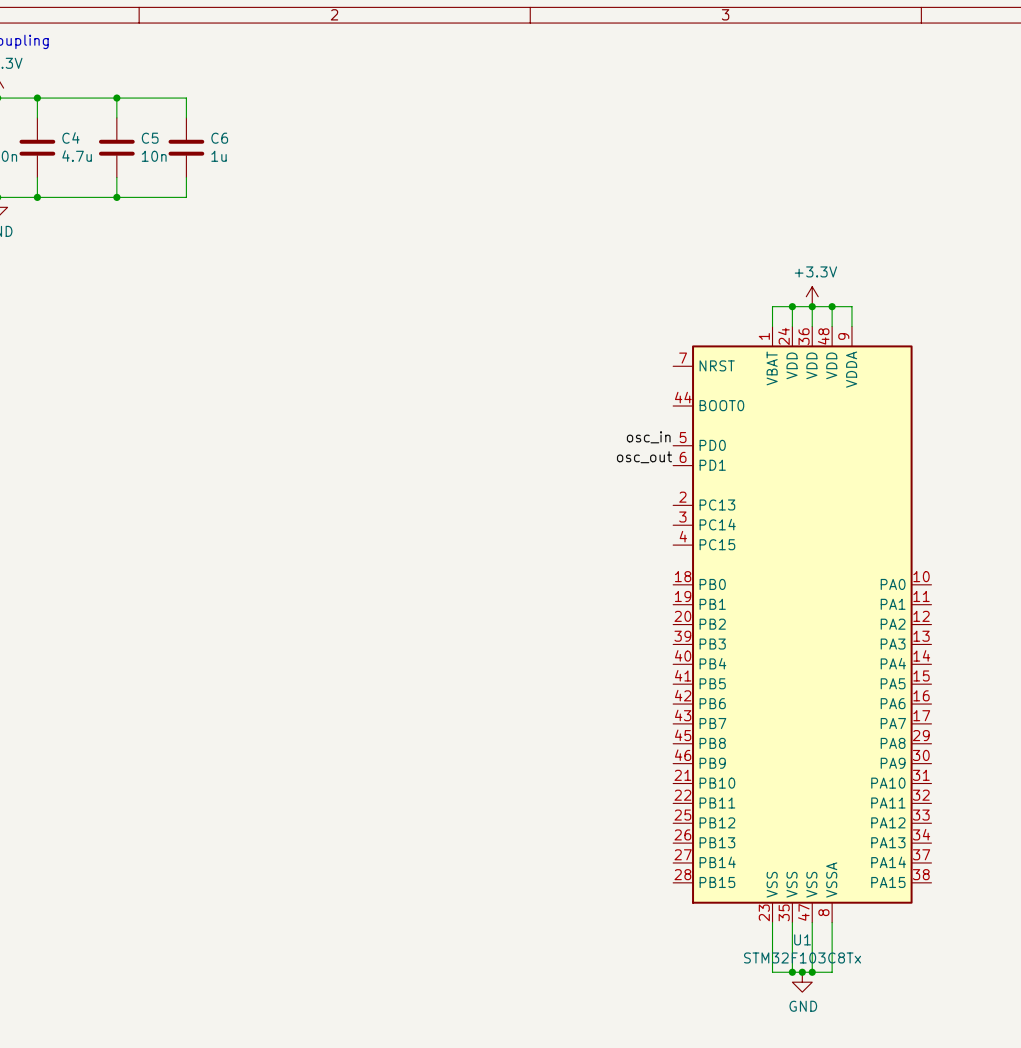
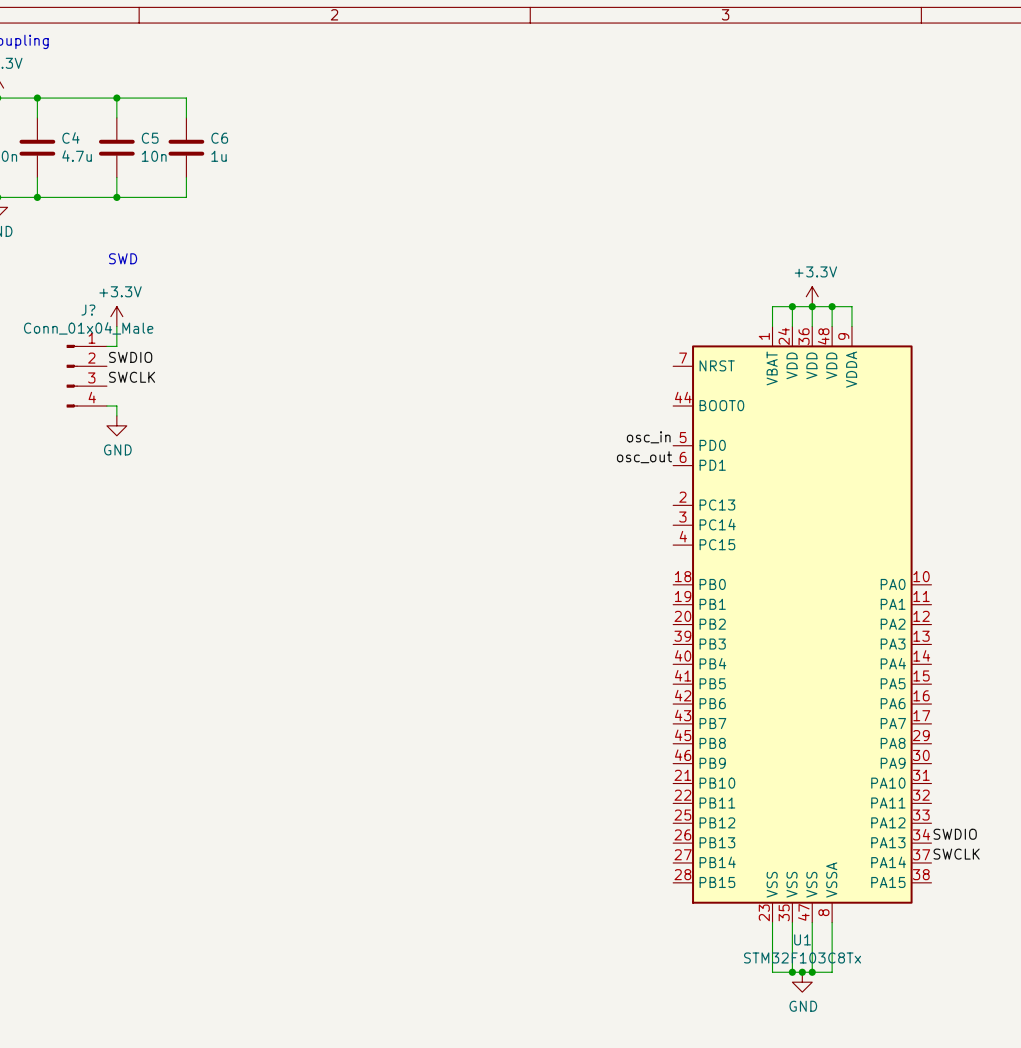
text: none -> SWD (123, 258)
power symbol: none -> +3.3V (116, 316)
wire: none -> (116, 326) (116, 346) (106, 346)
label: none -> SWDIO (130, 357)
J?: none -> Conn_01x04_Male (86, 376)
label: none -> SWCLK (132, 377)
wire: none -> (106, 406) (116, 406) (116, 415)
power symbol: none -> GND (116, 425)
label: none -> SWDIO (955, 834)
label: none -> SWCLK (956, 854)

